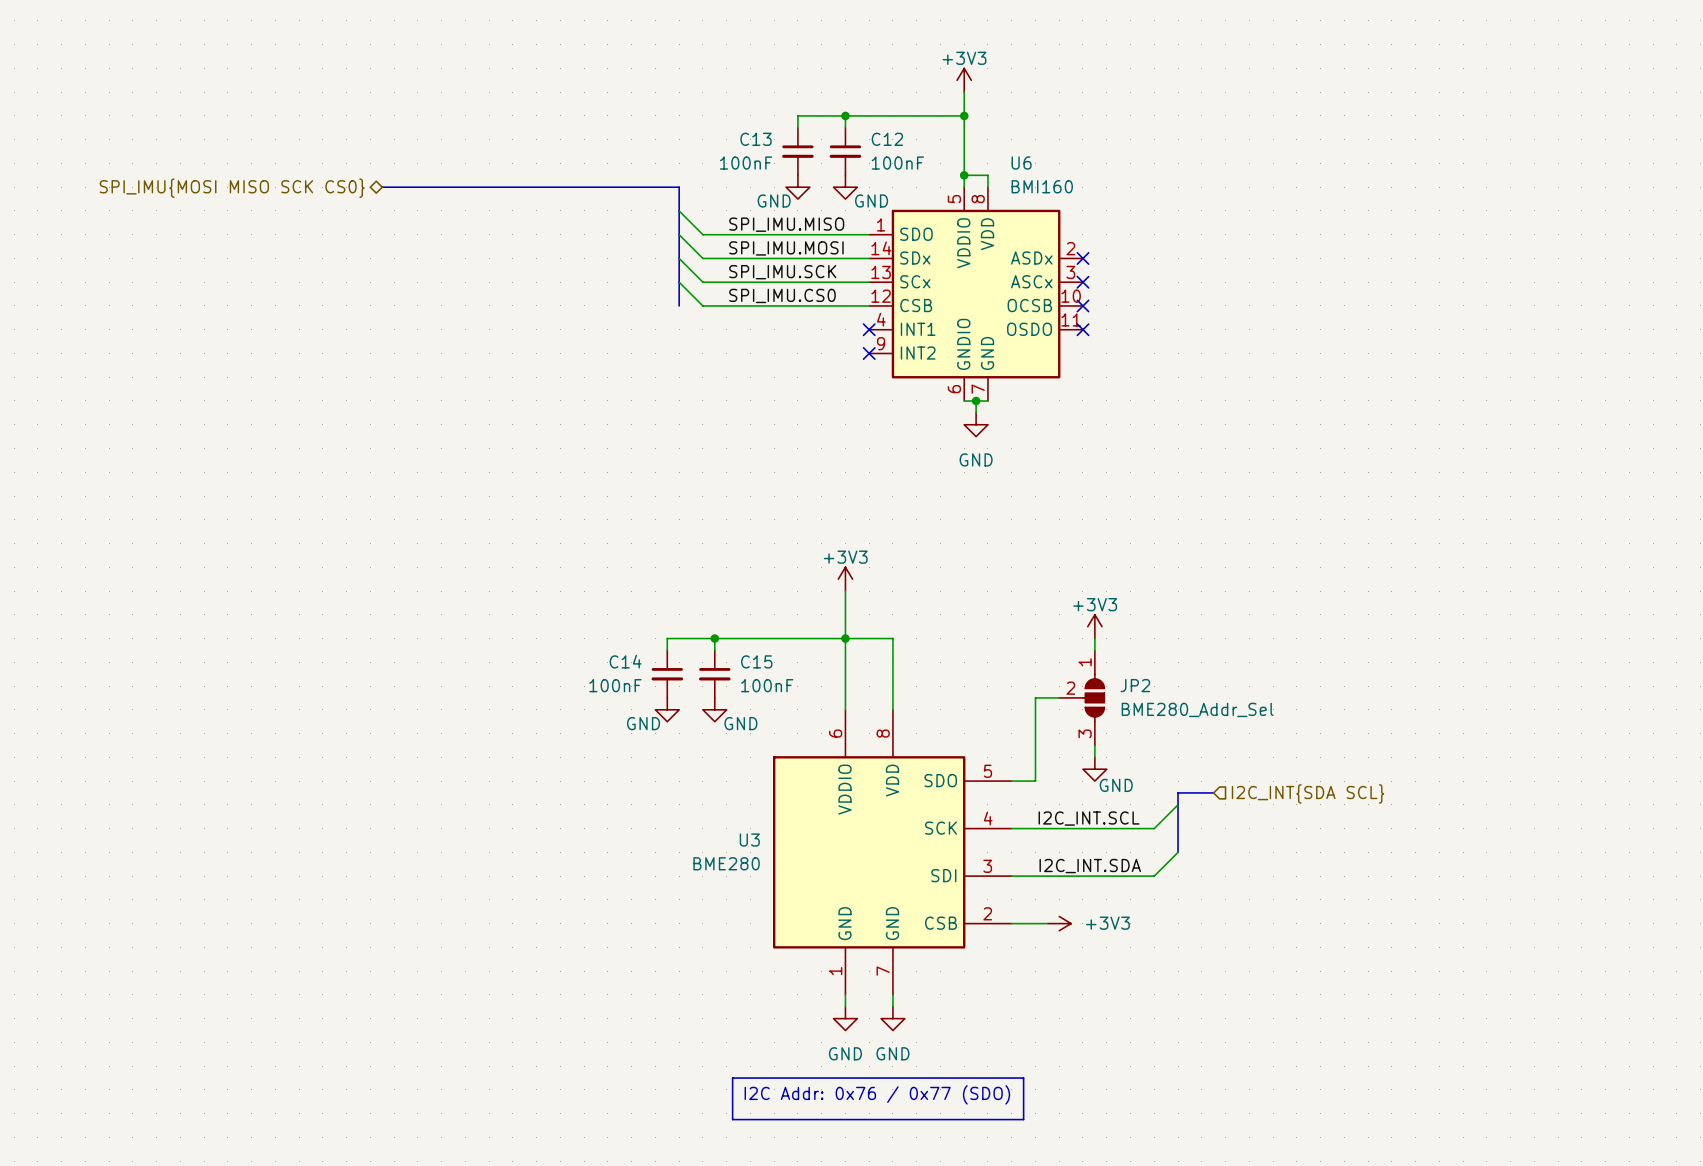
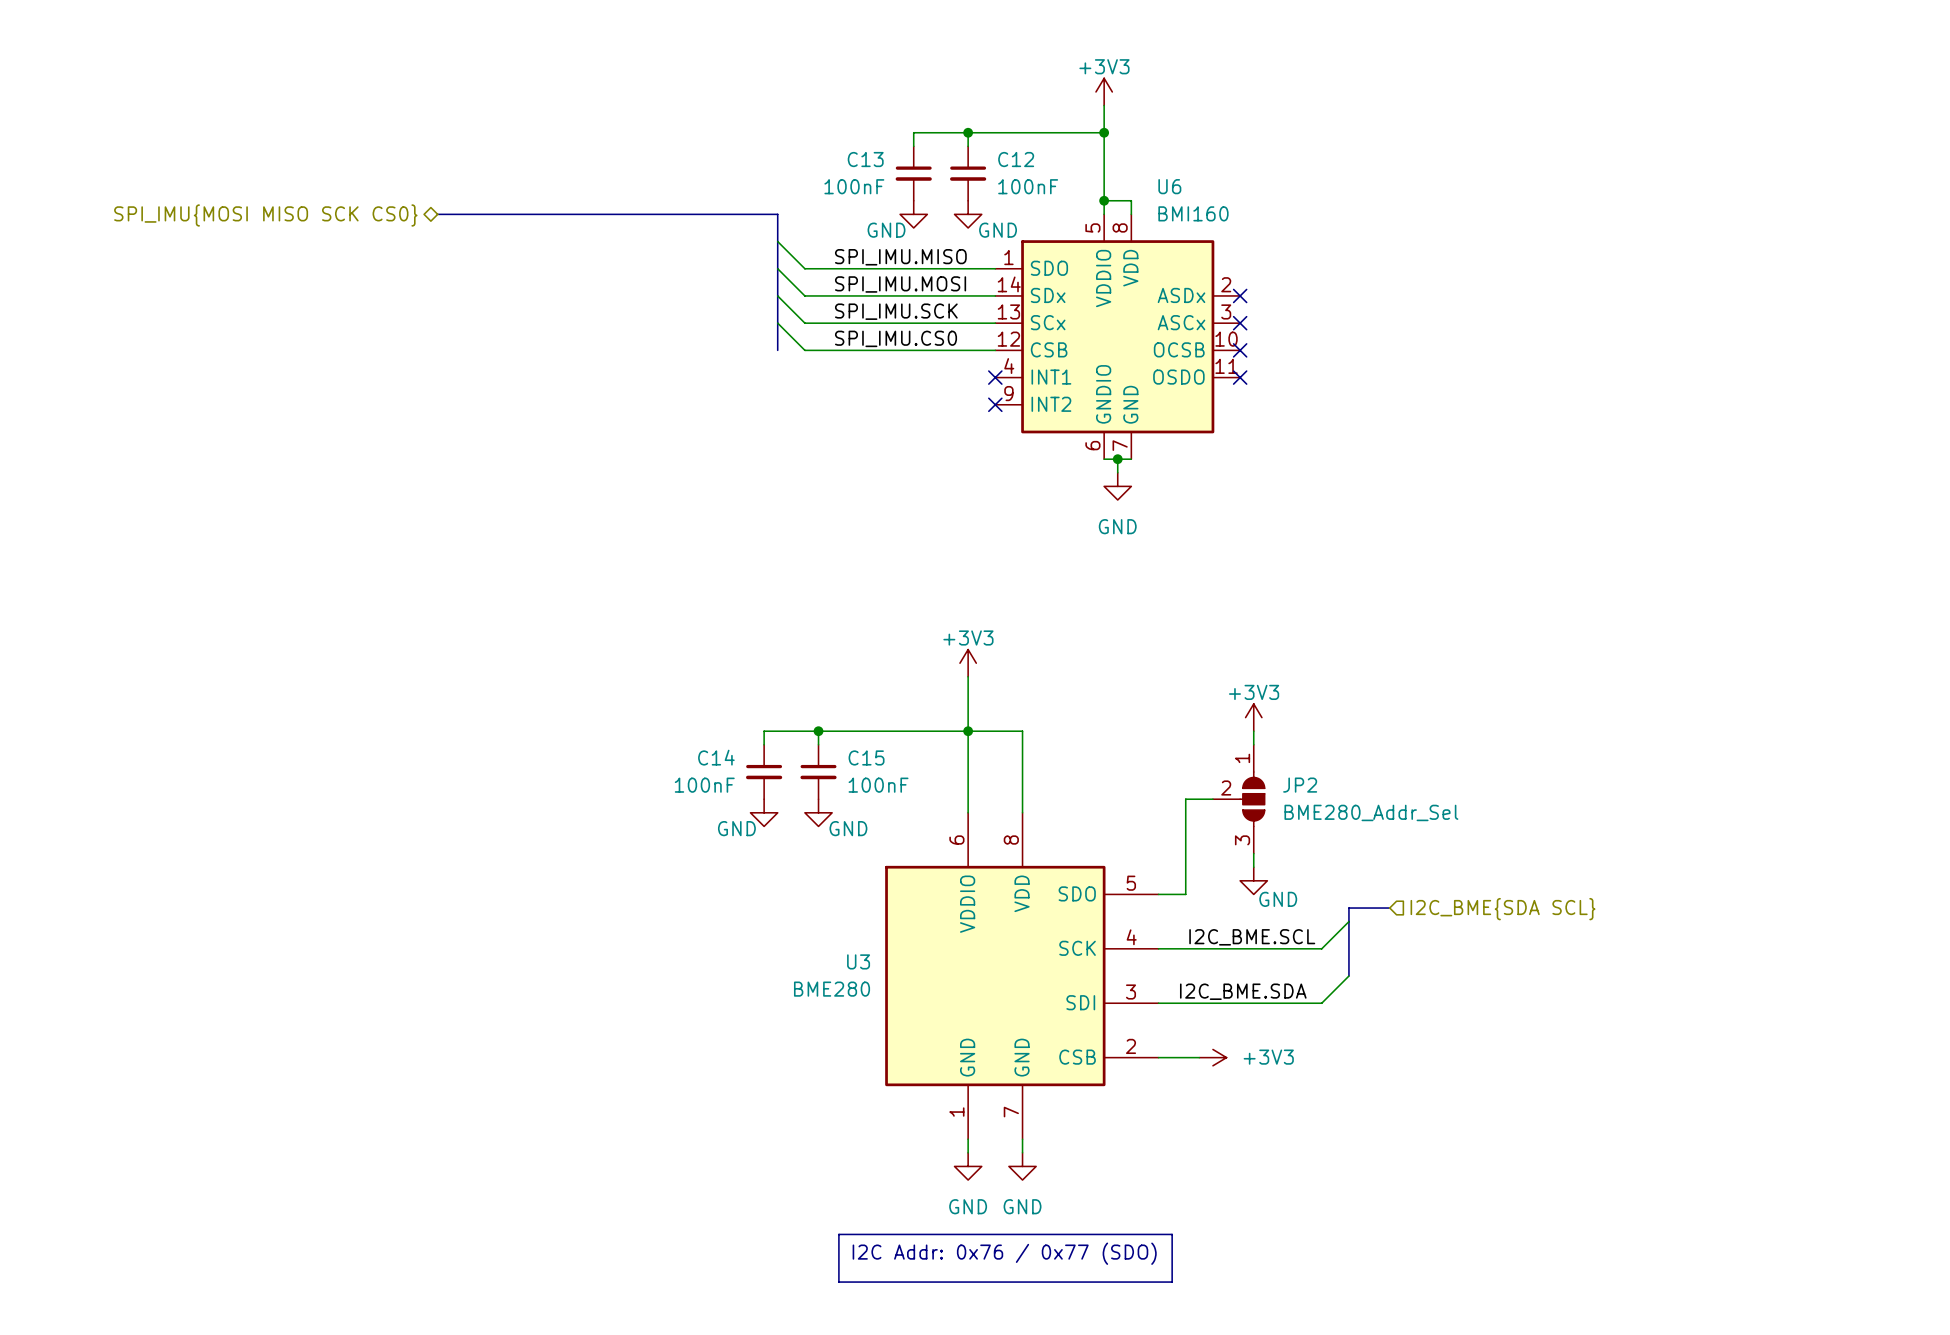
hierarchical label: I2C_INT{SDA SCL} (1308, 793) -> I2C_BME{SDA SCL} (1502, 909)
label: I2C_INT.SCL (1089, 818) -> I2C_BME.SCL (1252, 937)
label: I2C_INT.SDA (1090, 866) -> I2C_BME.SDA (1243, 991)

